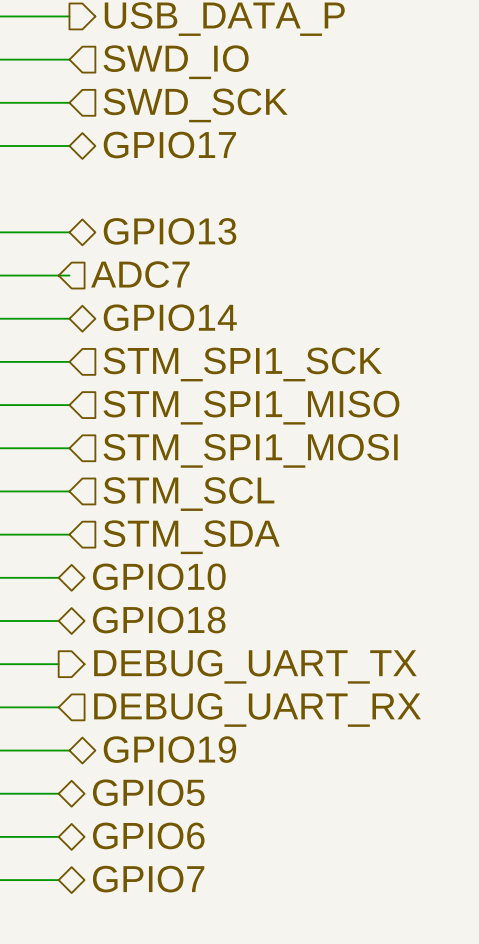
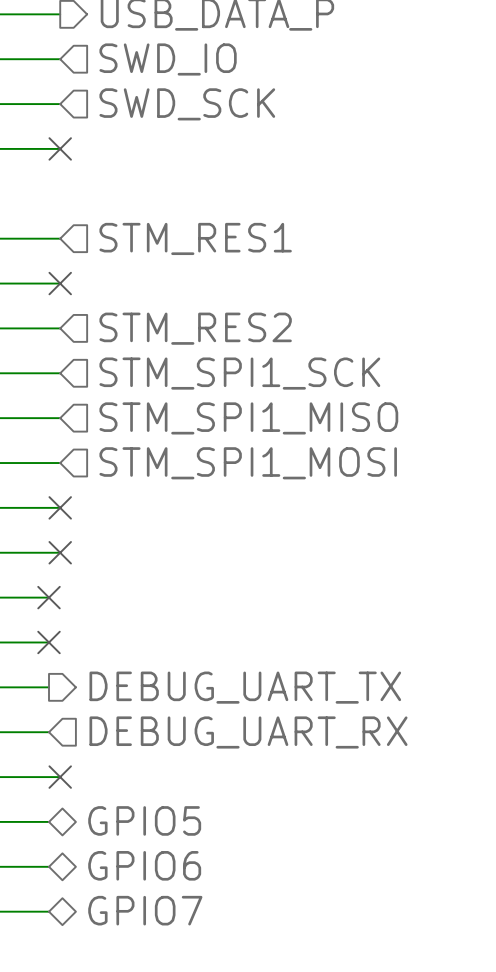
hierarchical label: GPIO17 (169, 145) -> none
no-connect mark: none -> (60, 148)
hierarchical label shape: bidirectional (170, 231) -> input (195, 238)
hierarchical label: GPIO13 (170, 231) -> STM_RES1 (195, 238)
hierarchical label: ADC7 (140, 274) -> none
no-connect mark: none -> (60, 283)
hierarchical label shape: bidirectional (170, 317) -> input (195, 328)
hierarchical label: GPIO14 (170, 317) -> STM_RES2 (195, 328)
no-connect mark: none -> (60, 507)
hierarchical label: STM_SCL (188, 494) -> none
no-connect mark: none -> (60, 552)
hierarchical label: STM_SDA (191, 537) -> none
hierarchical label: GPIO10 (159, 576) -> none
no-connect mark: none -> (49, 597)
hierarchical label: GPIO18 (159, 620) -> none
no-connect mark: none -> (49, 642)
hierarchical label: GPIO19 (169, 749) -> none
no-connect mark: none -> (60, 777)

